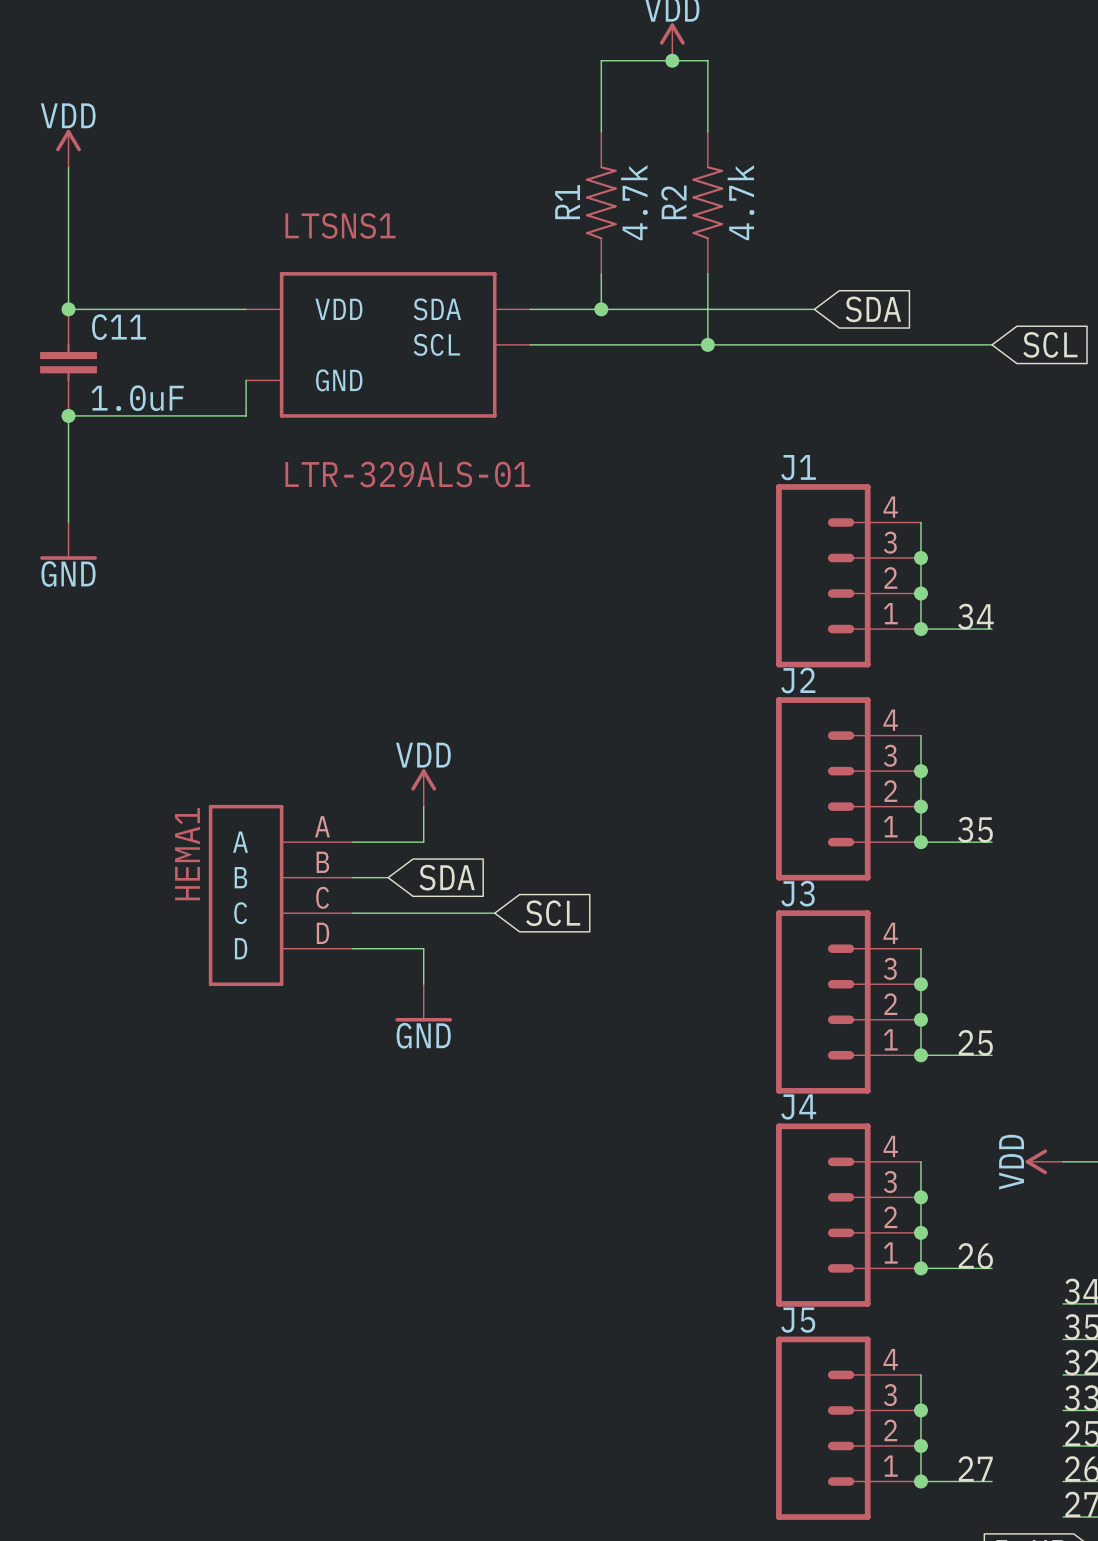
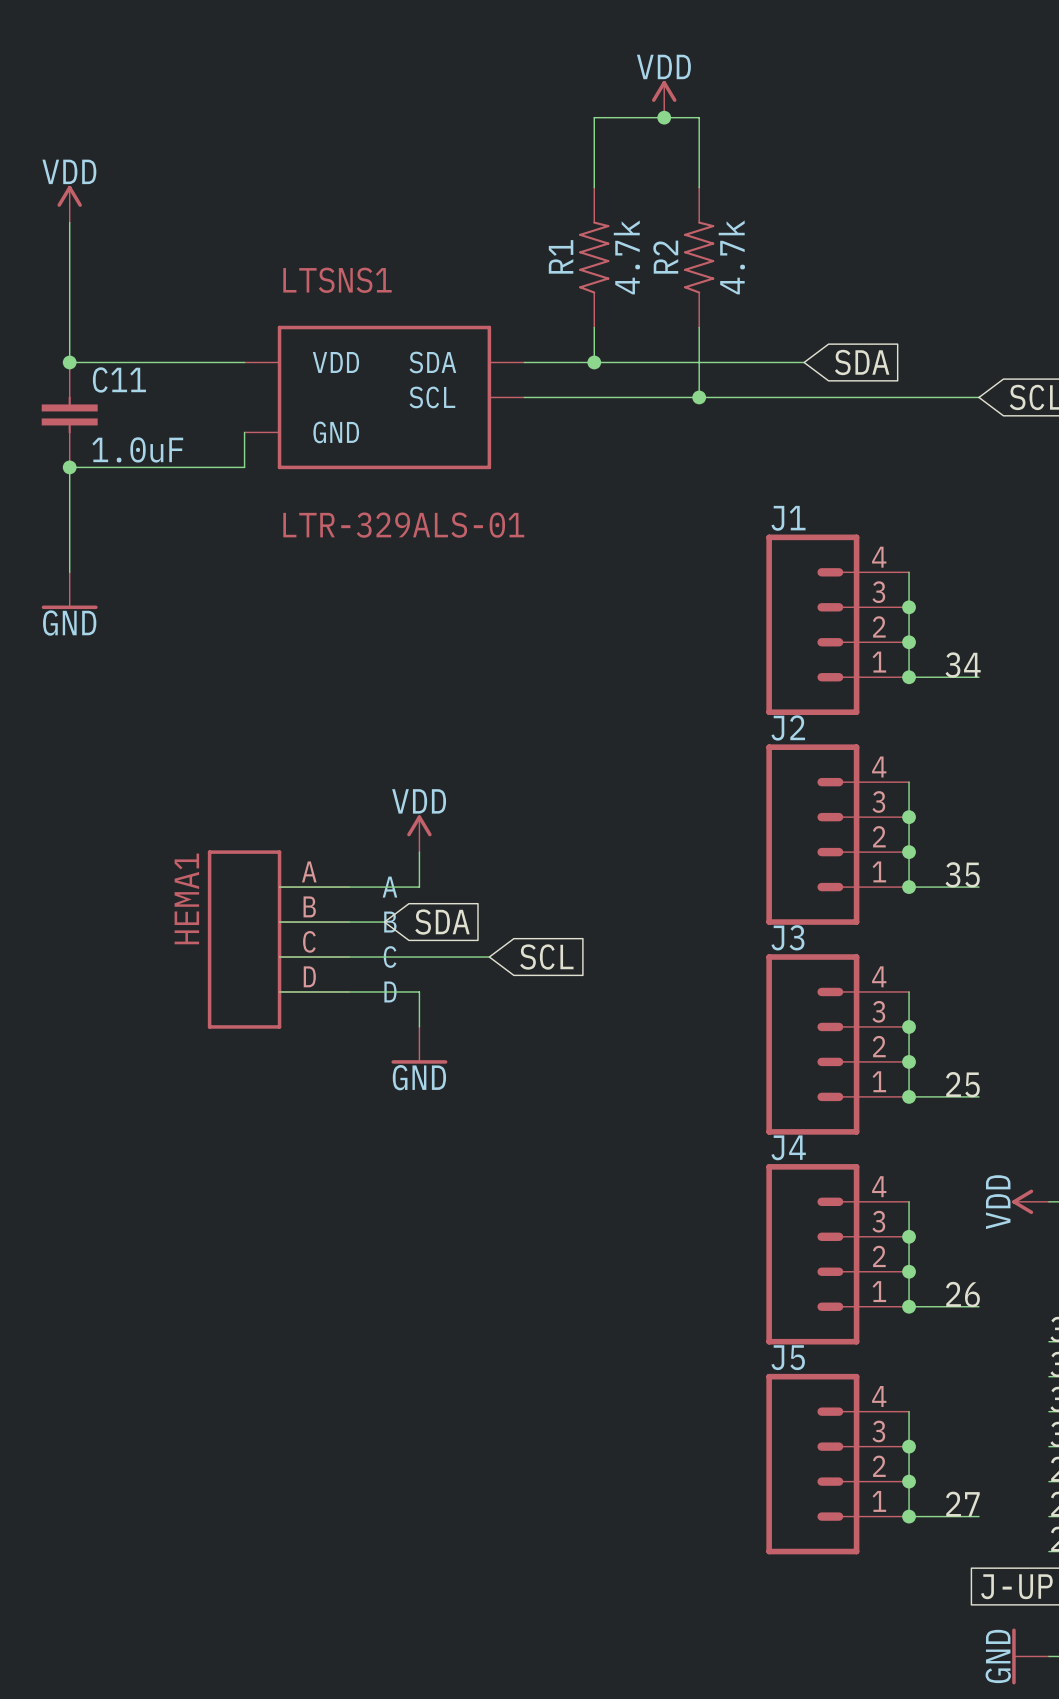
HEMA1 symbol: [208, 804, 353, 987] -> [207, 850, 350, 1029]

